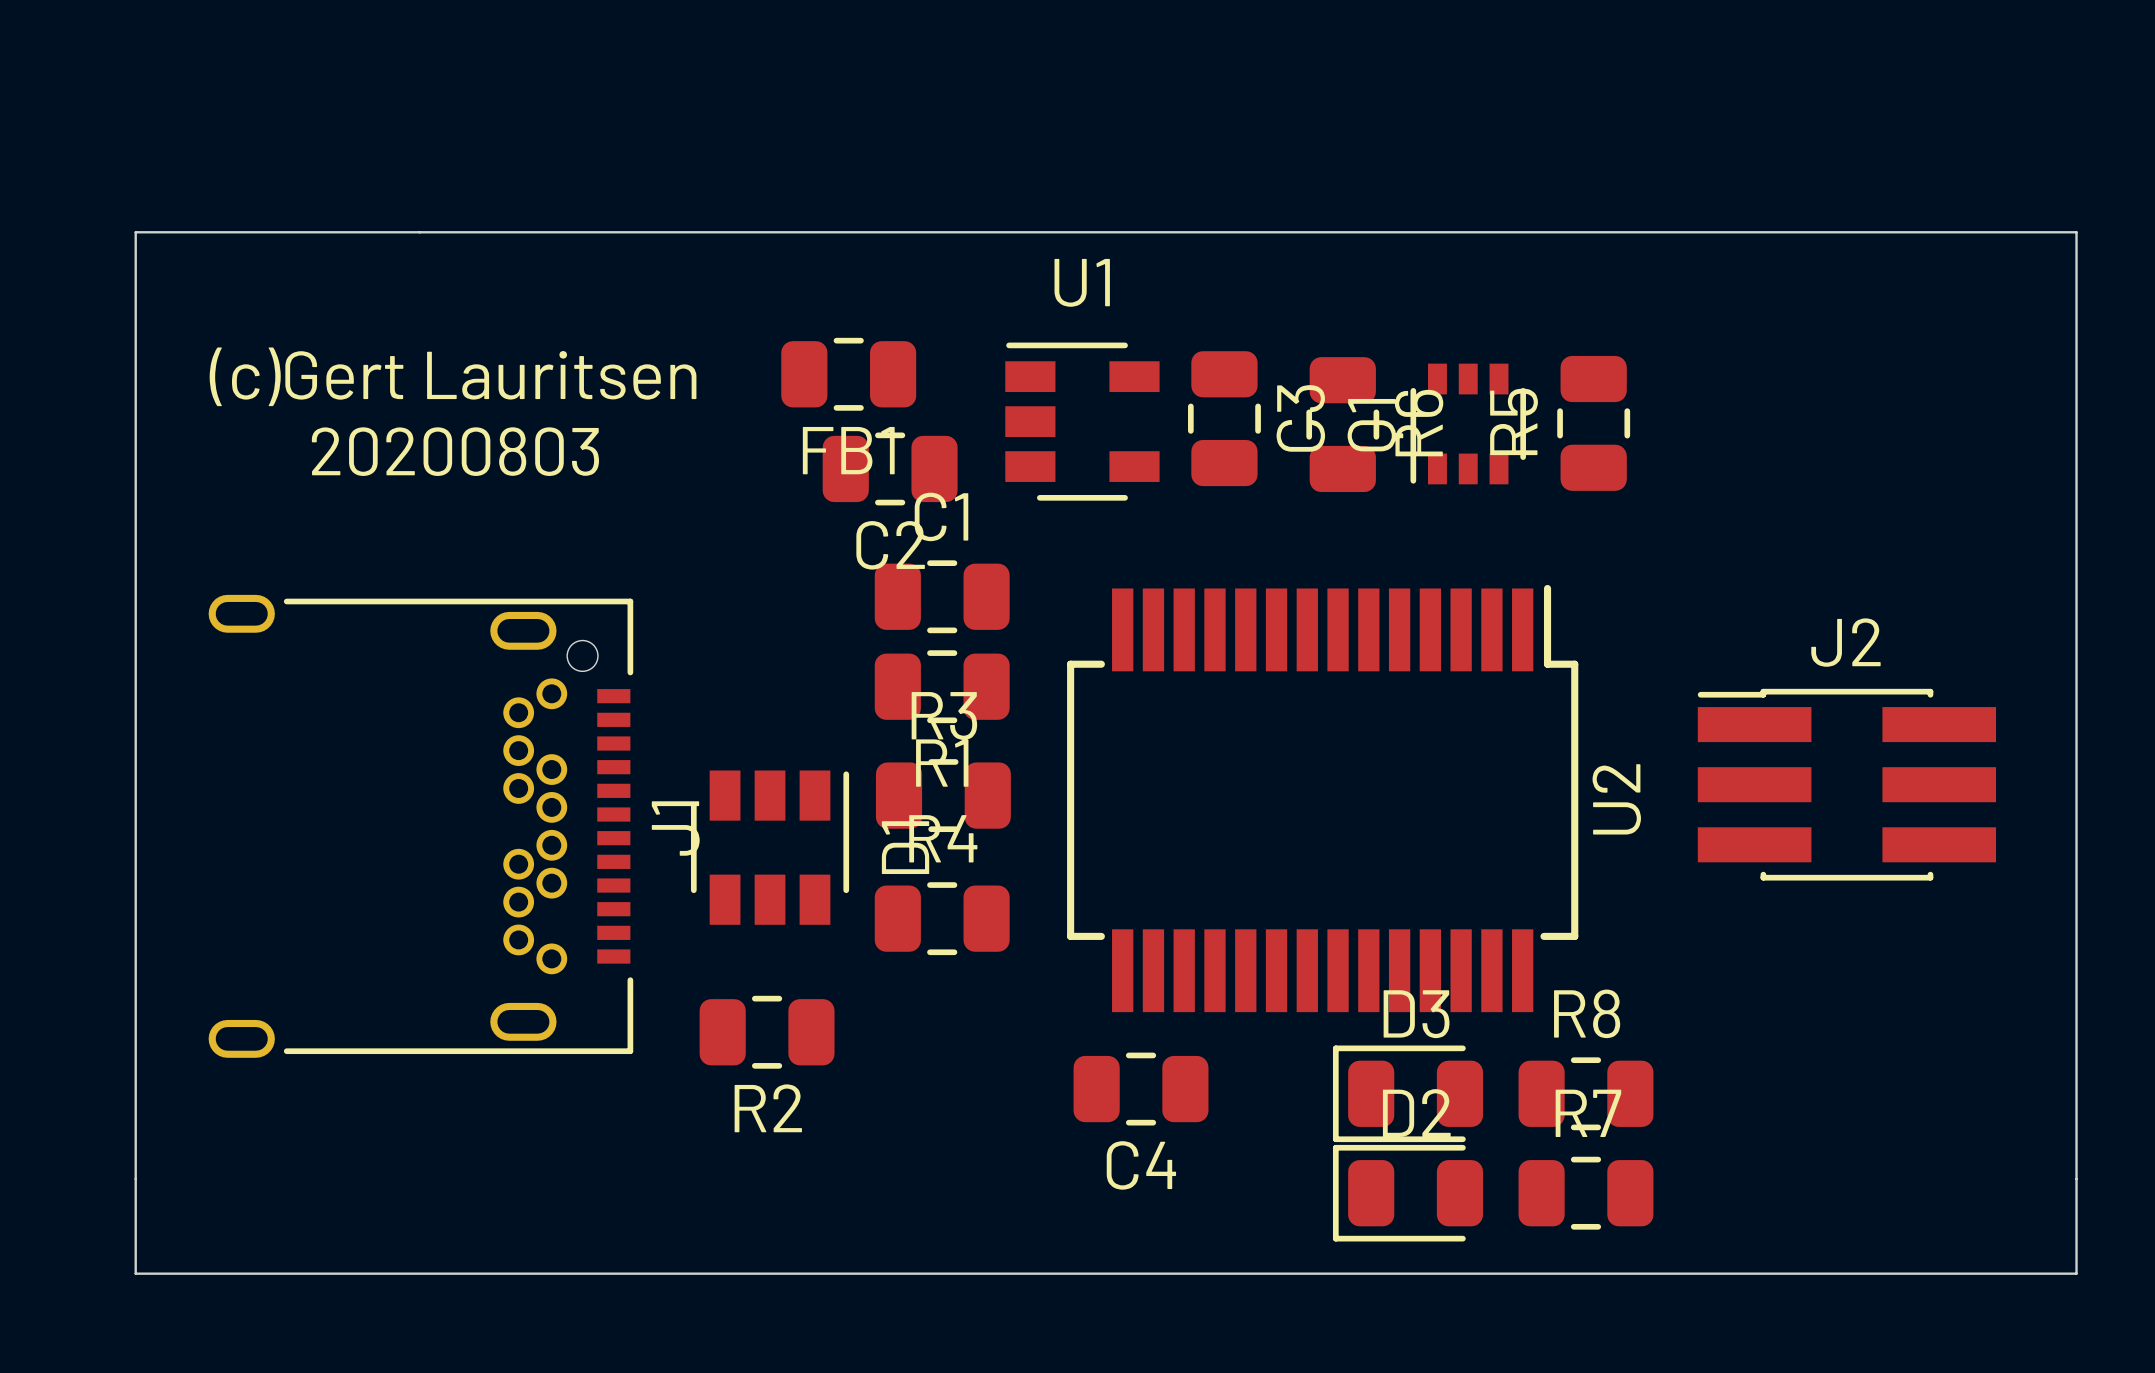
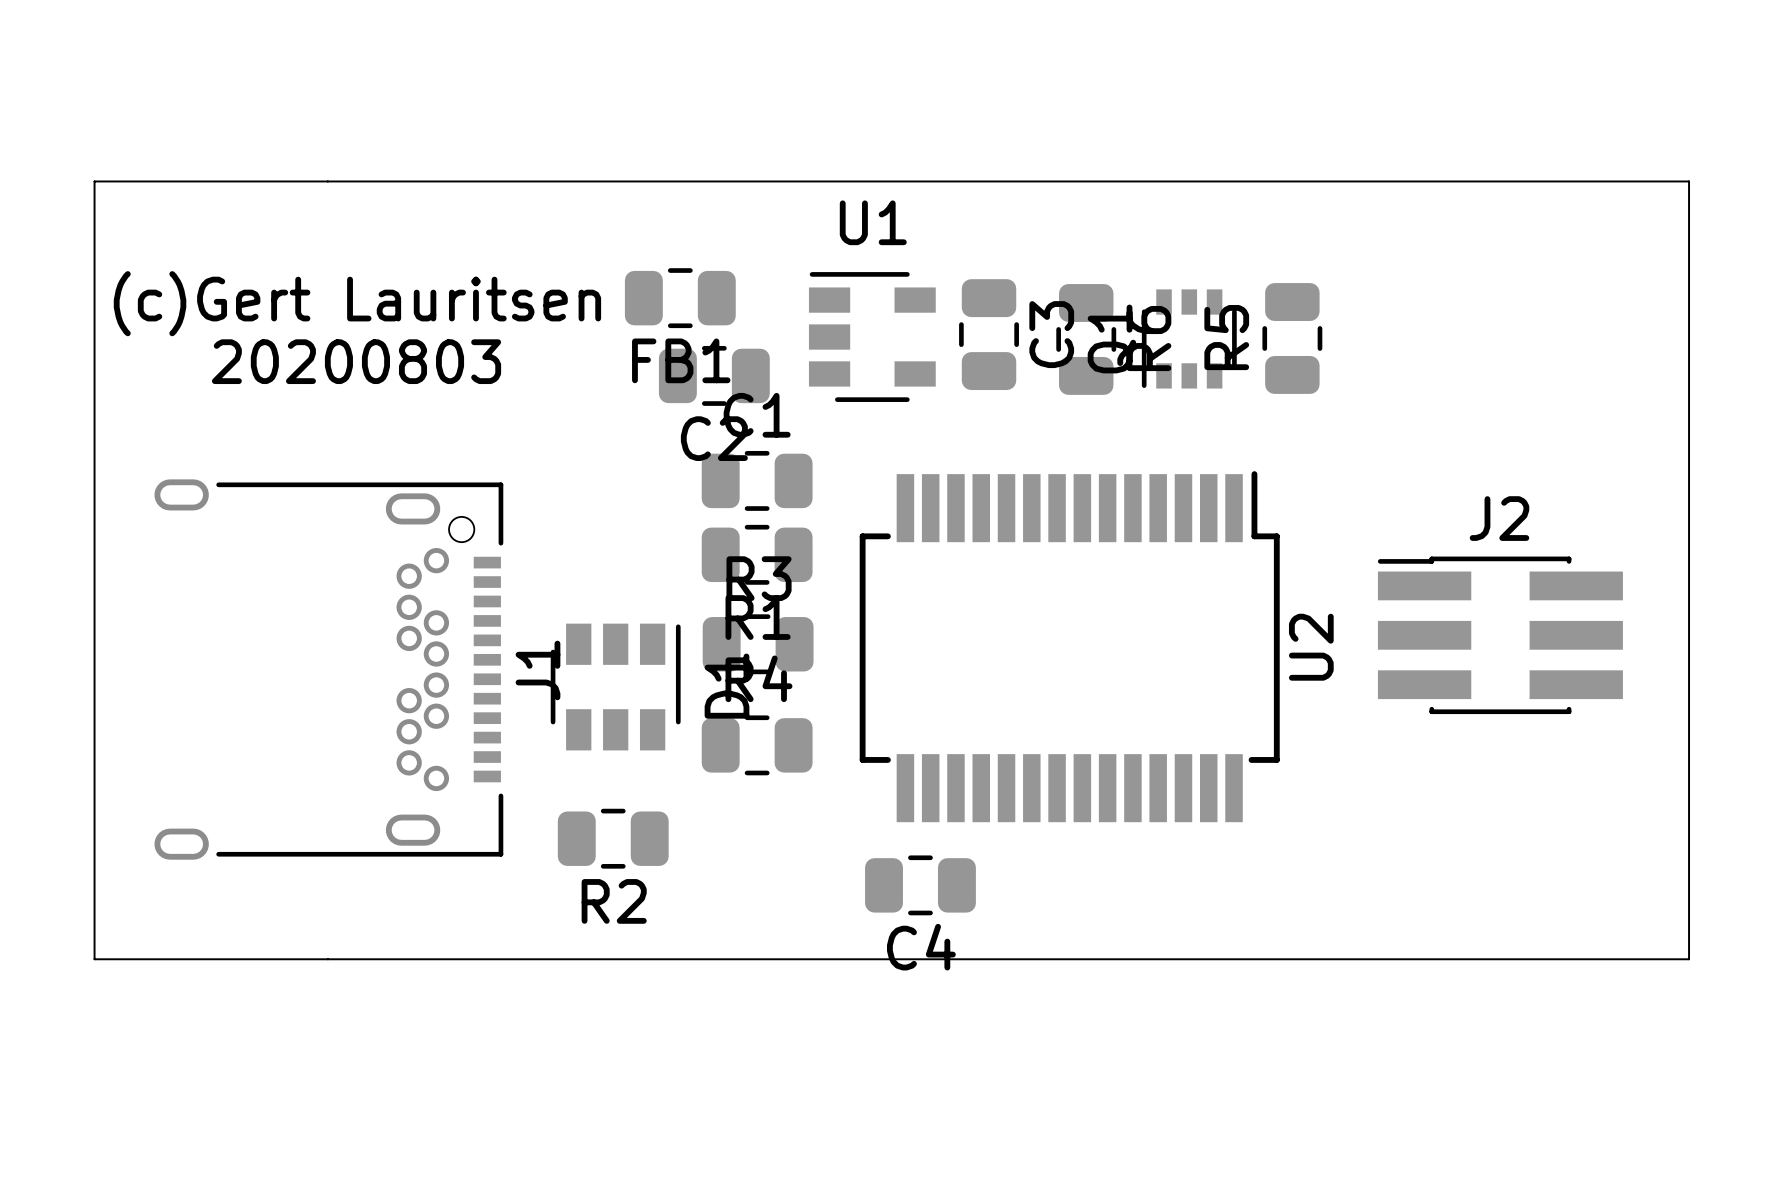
D3: (1408, 1093) -> none
R8: (1585, 1093) -> none
board edge: (135, 1179) (135, 1273) (2076, 1273) (2076, 1179) -> (94, 959) (1689, 959)
D2: (1408, 1193) -> none
R7: (1585, 1193) -> none

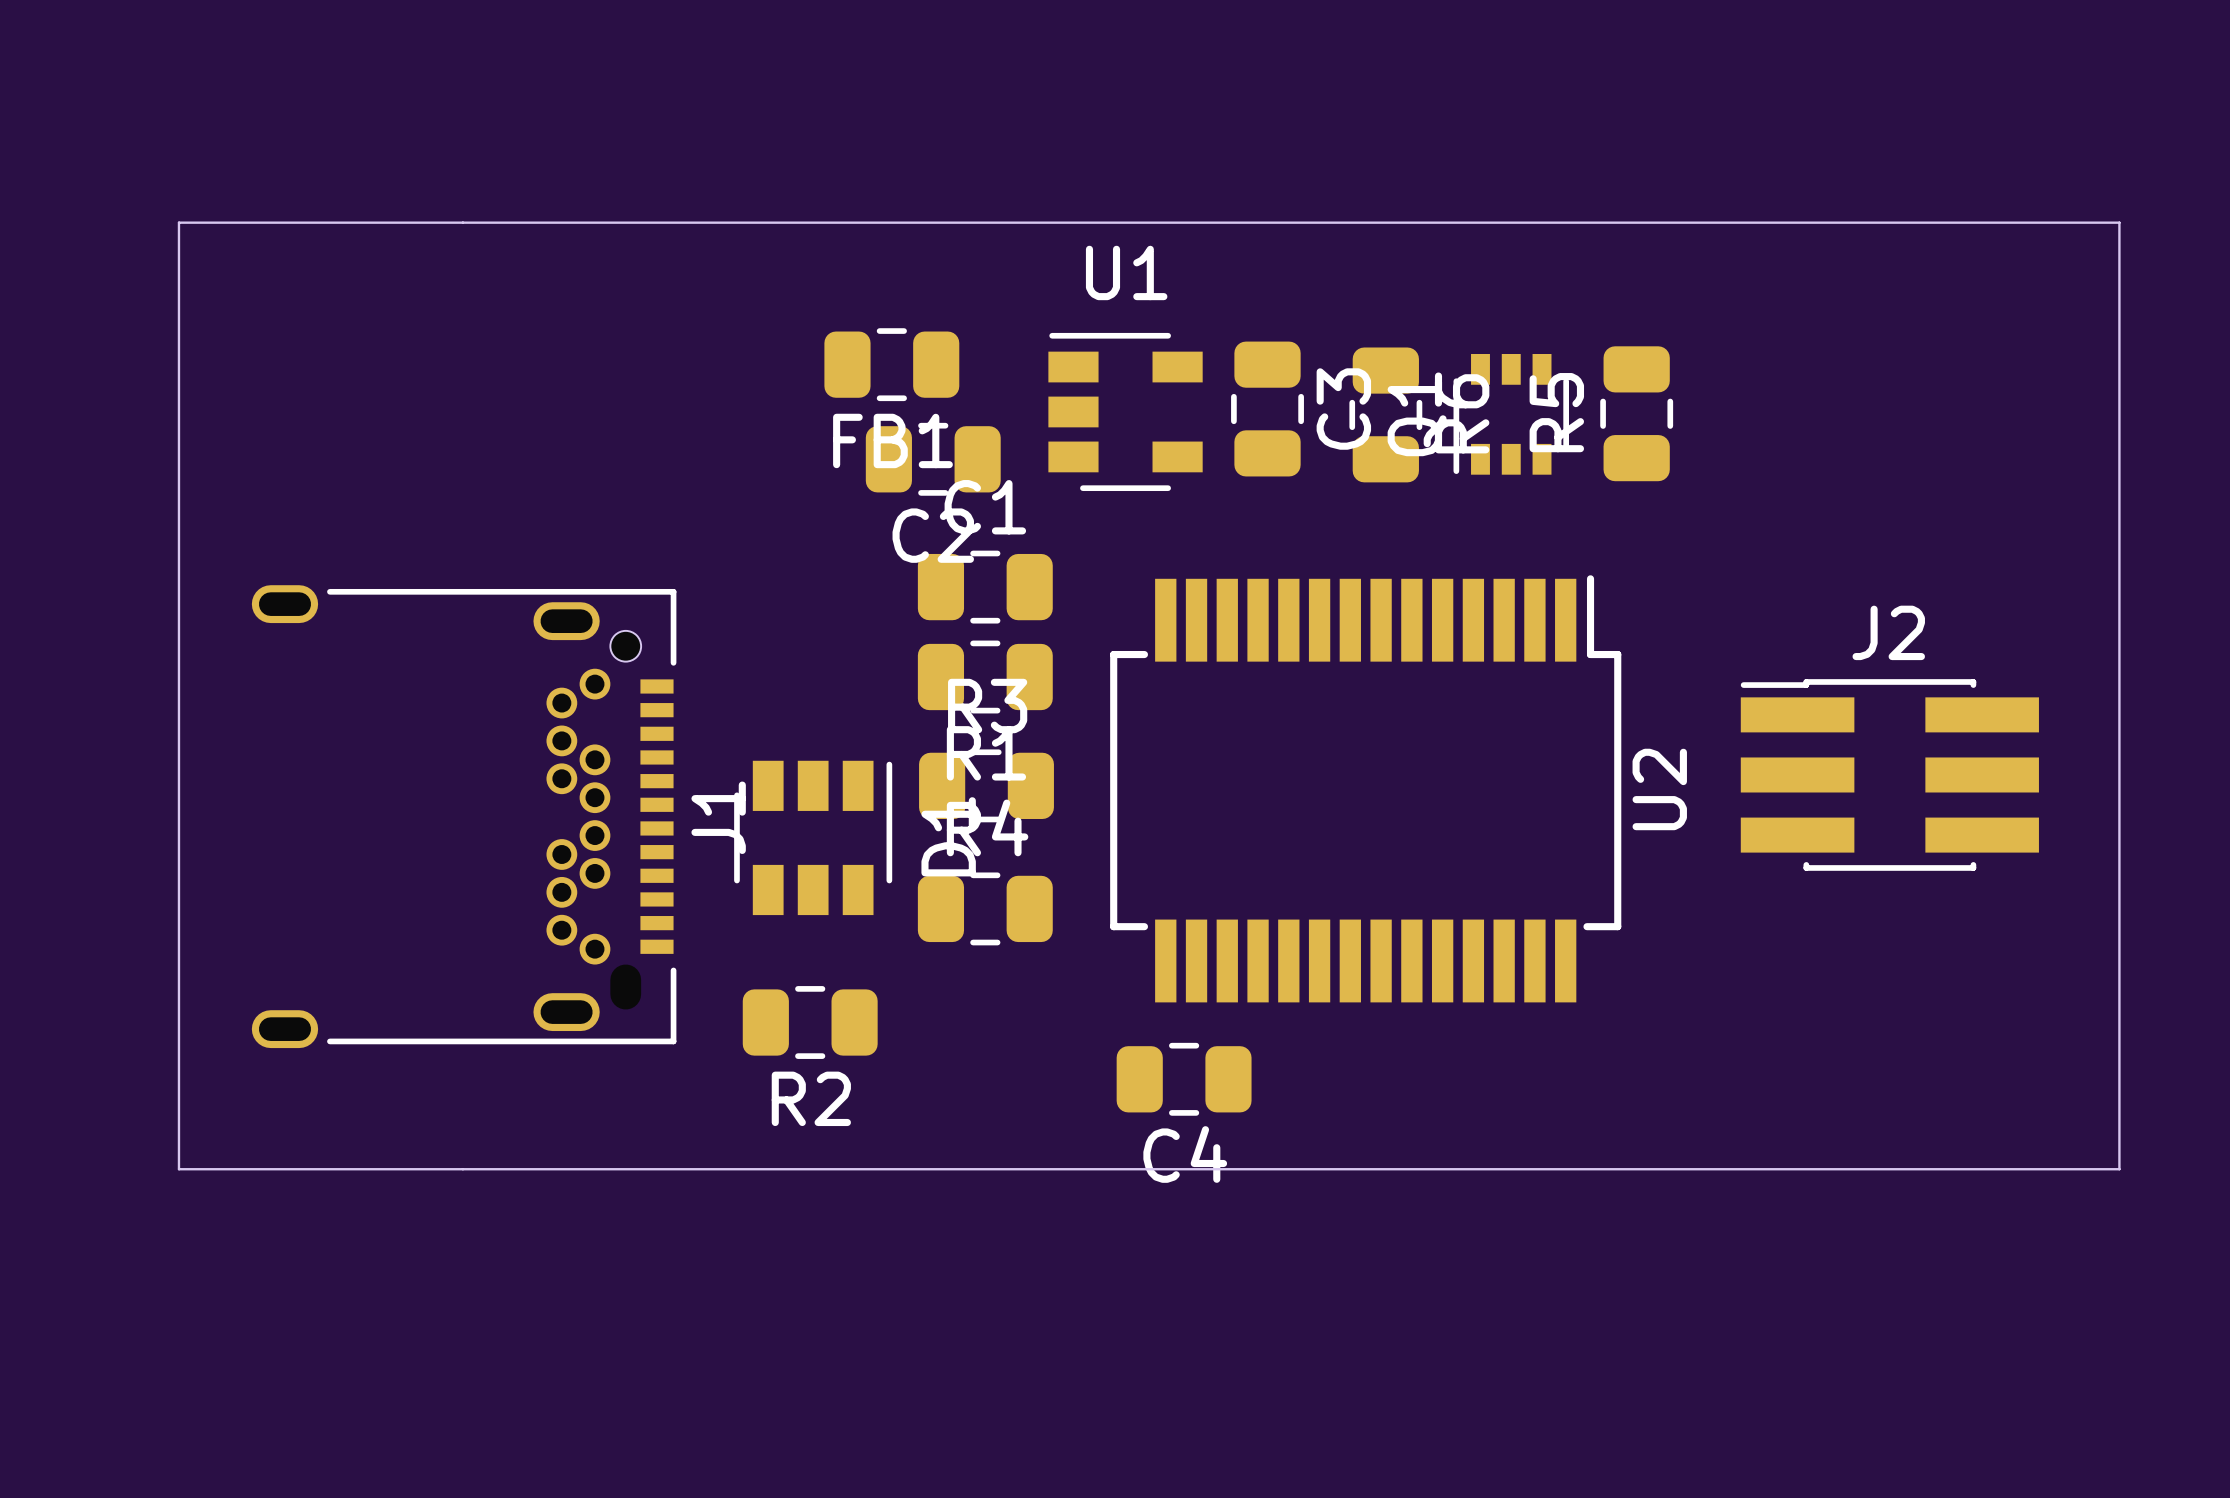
text: (c)Gert Lauritsen (357, 303) -> none
text: 20200803 (356, 361) -> none

